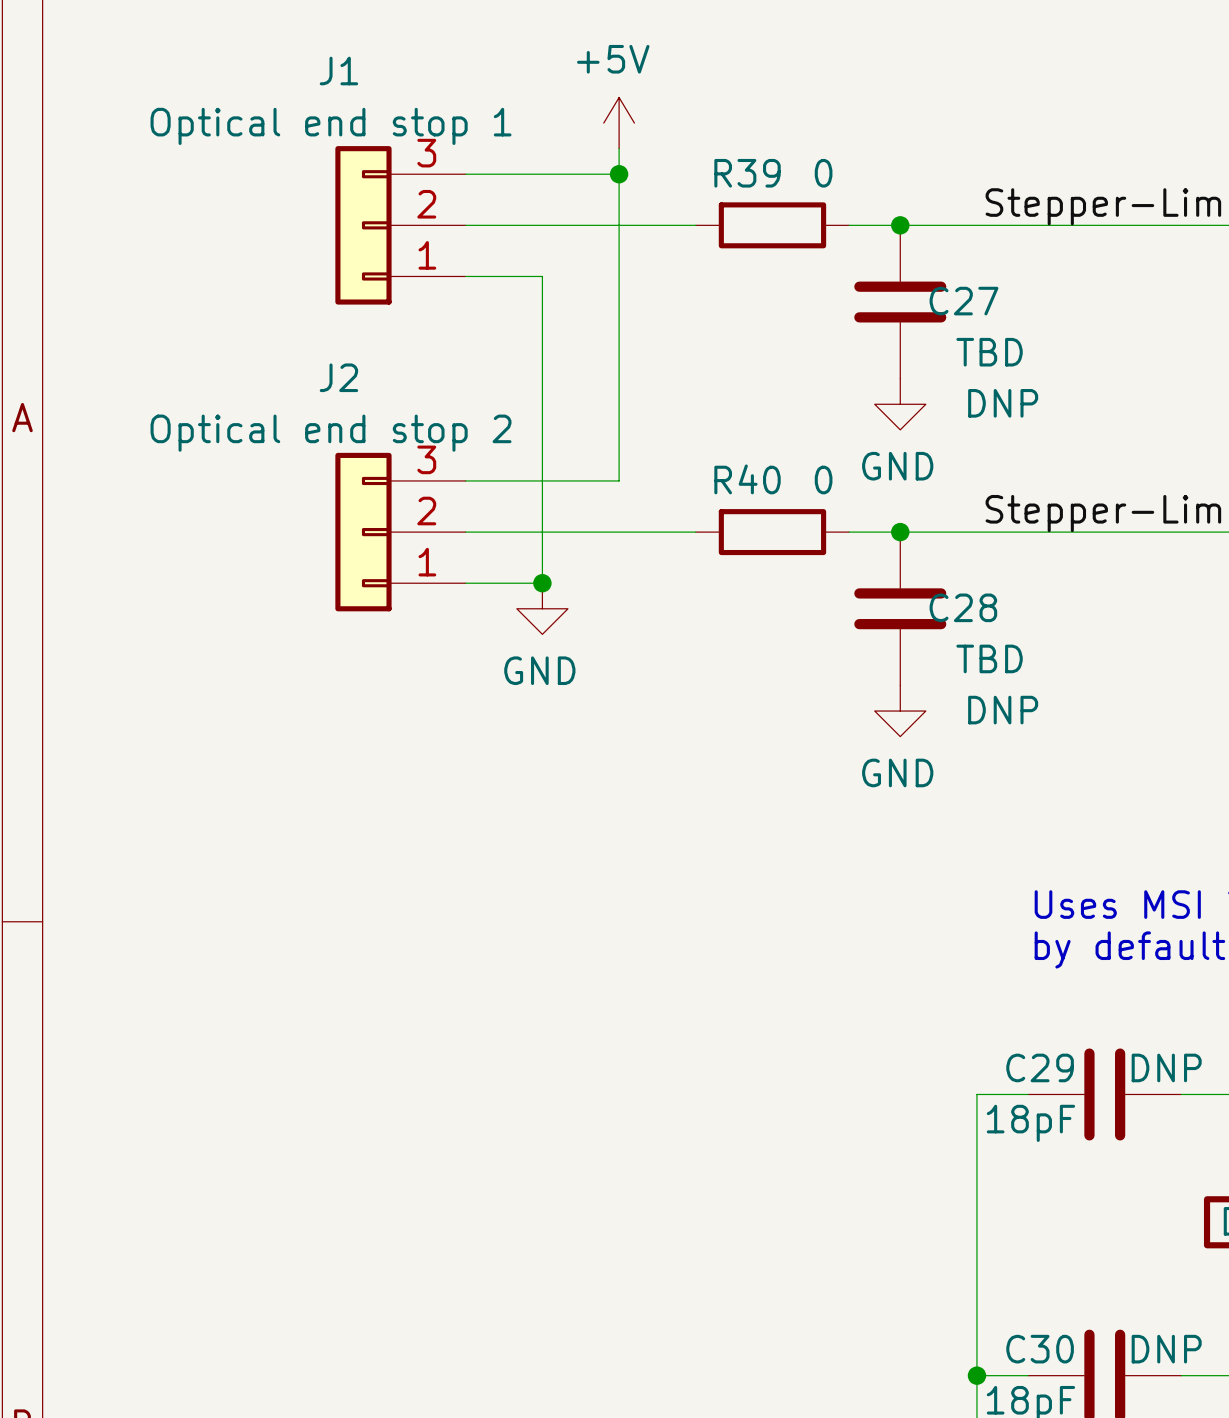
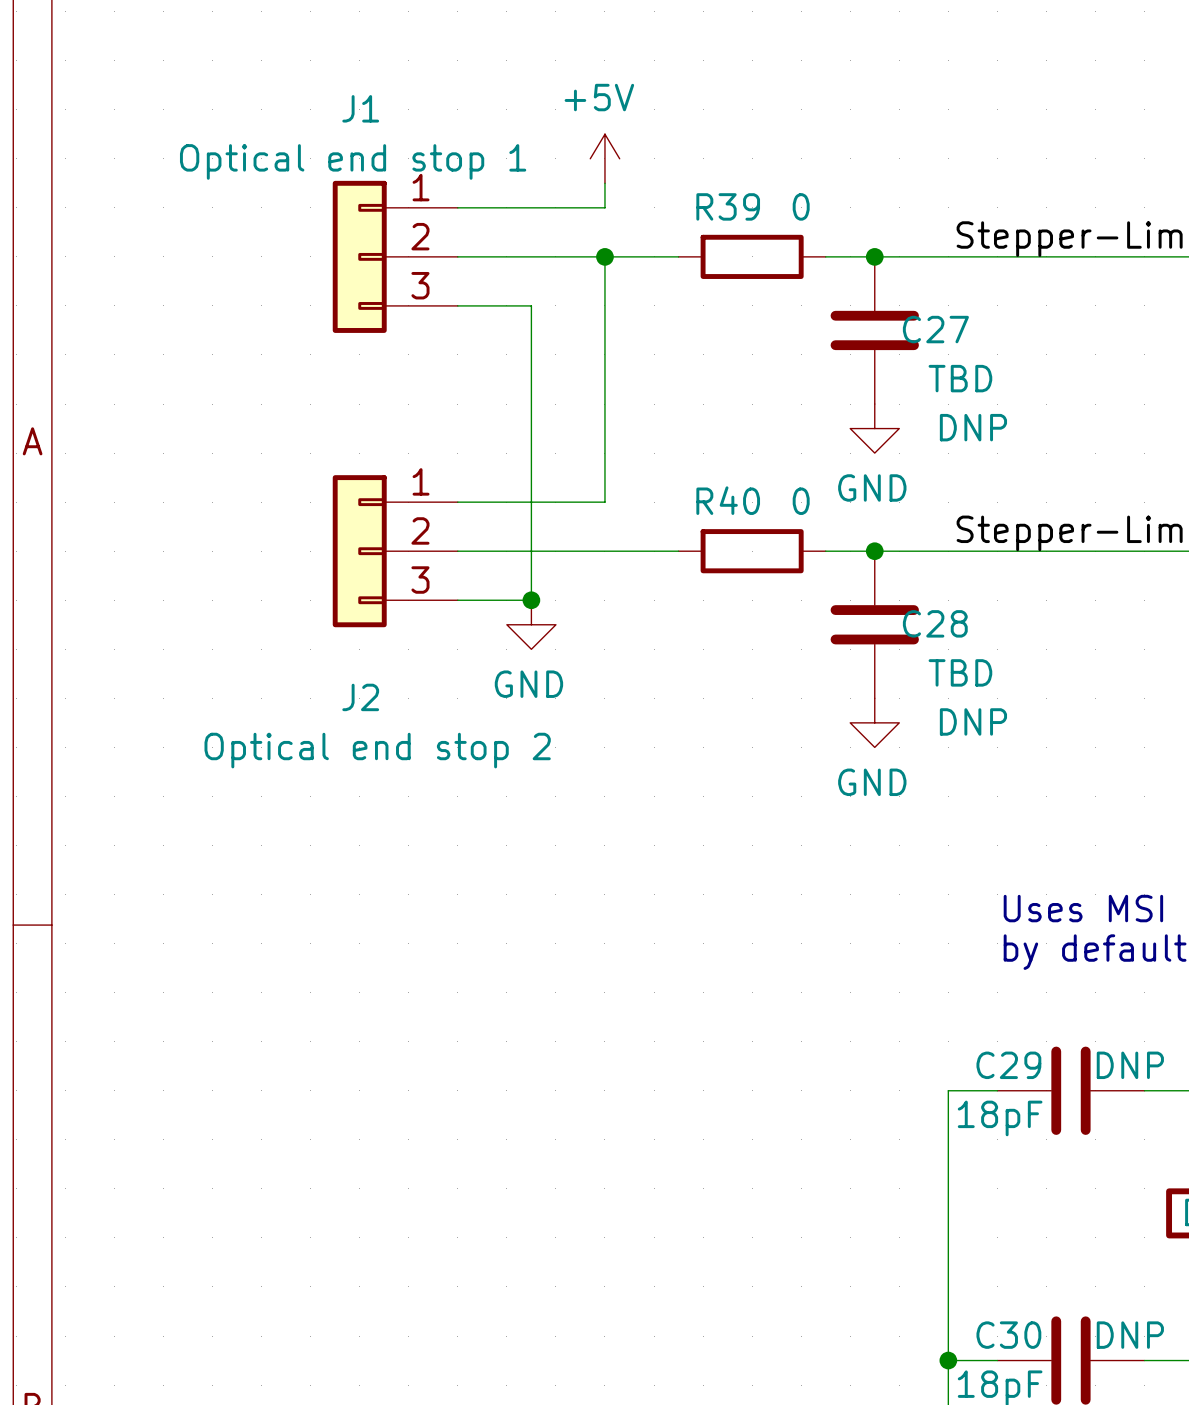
wire: (619, 174) (619, 225) -> none
junction position: (619, 174) -> (604, 256)
J1 flip: as is (363, 225) -> up-down (359, 256)
J2 value position: Optical end stop 2 (331, 433) -> Optical end stop 2 (377, 750)
J2 flip: as is (363, 532) -> up-down (359, 551)

